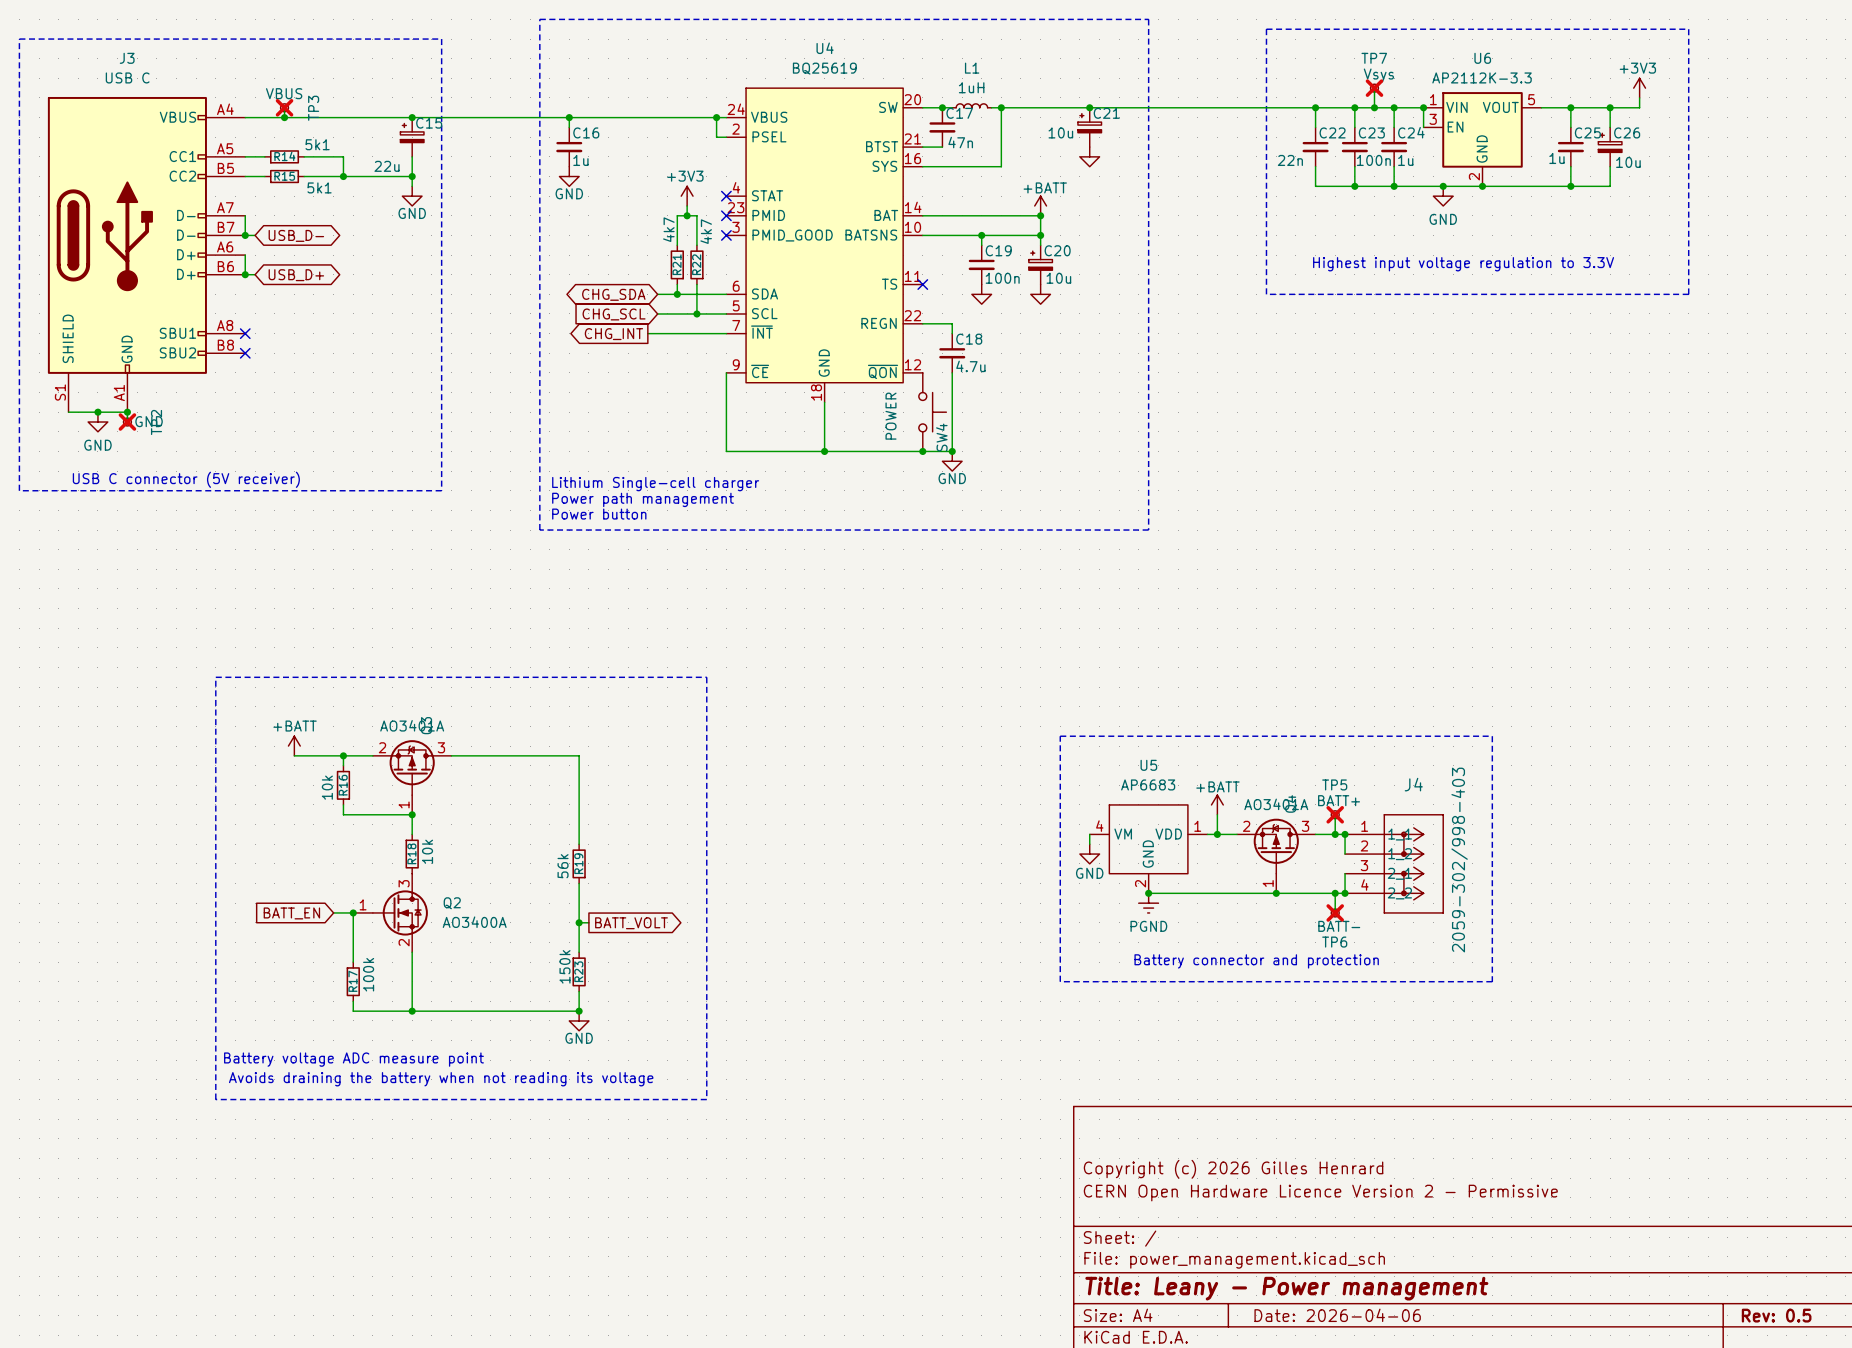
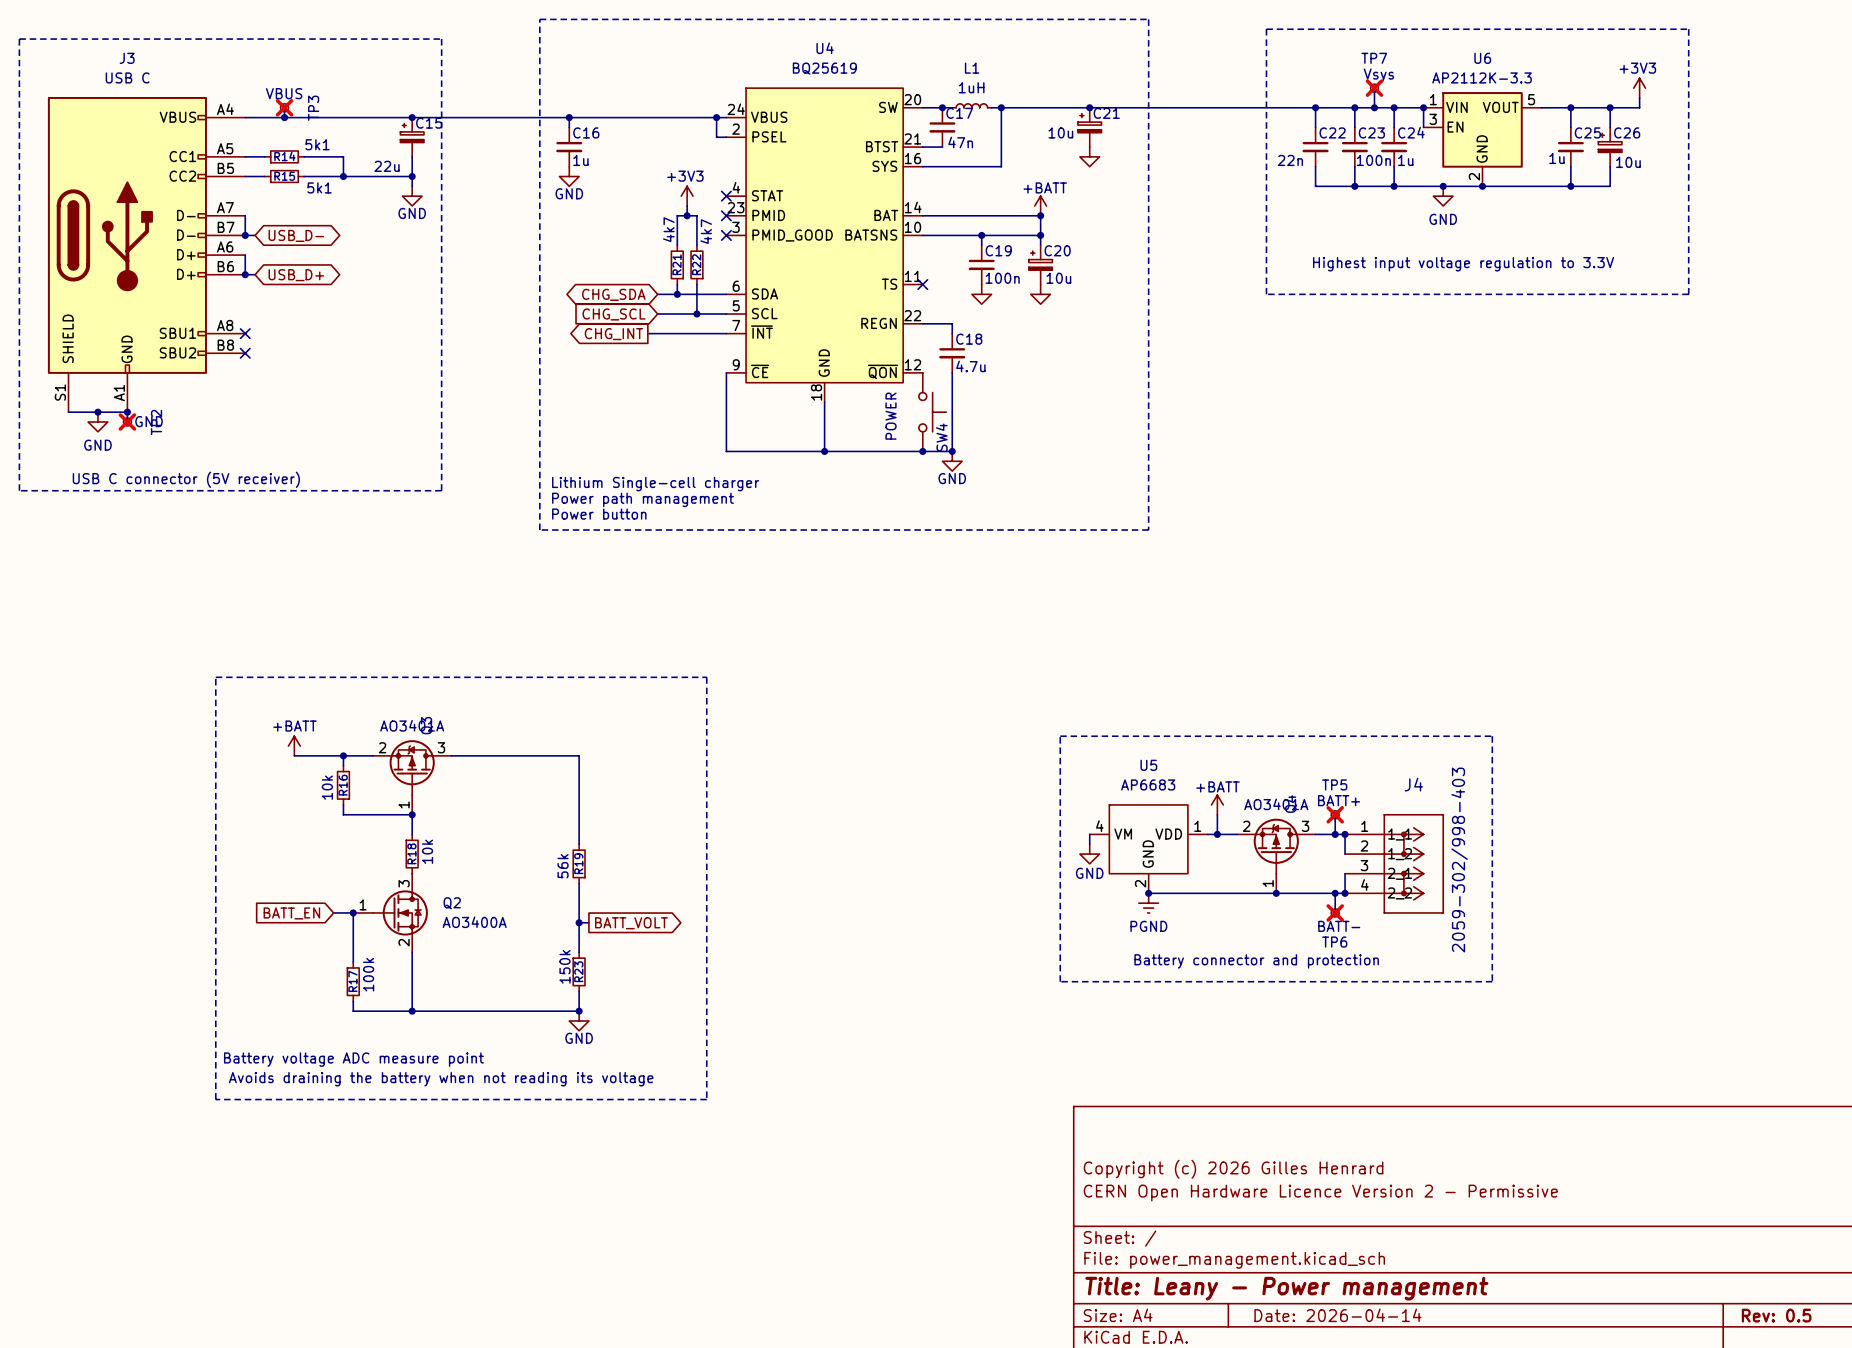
title block: Date: 2026-04-06 (1337, 1315) -> Date: 2026-04-14 (1337, 1315)

